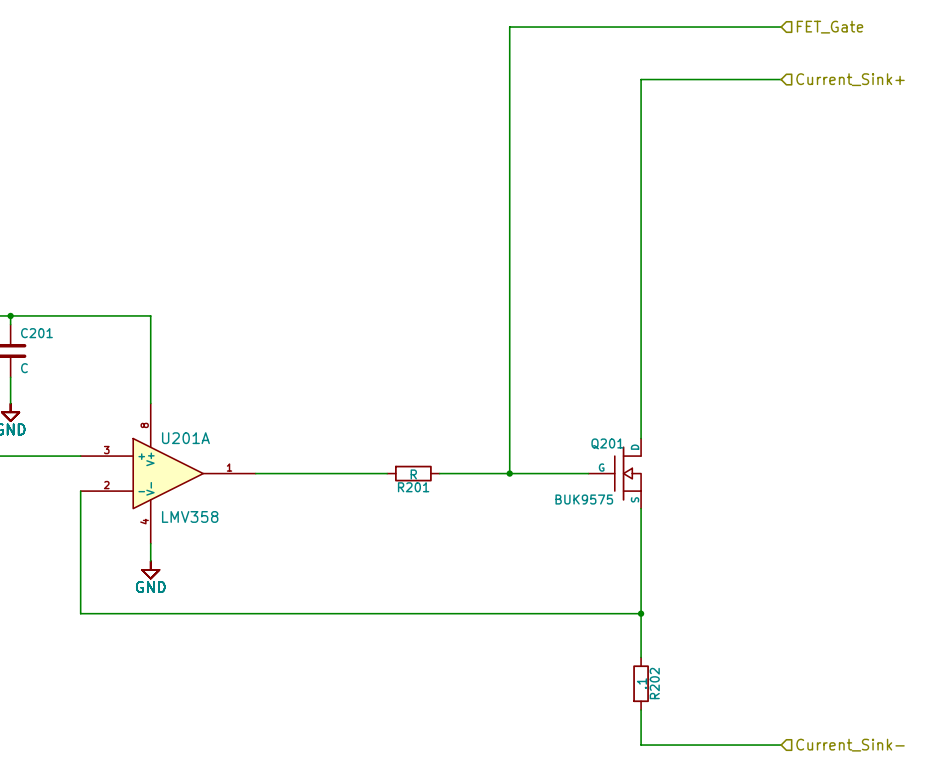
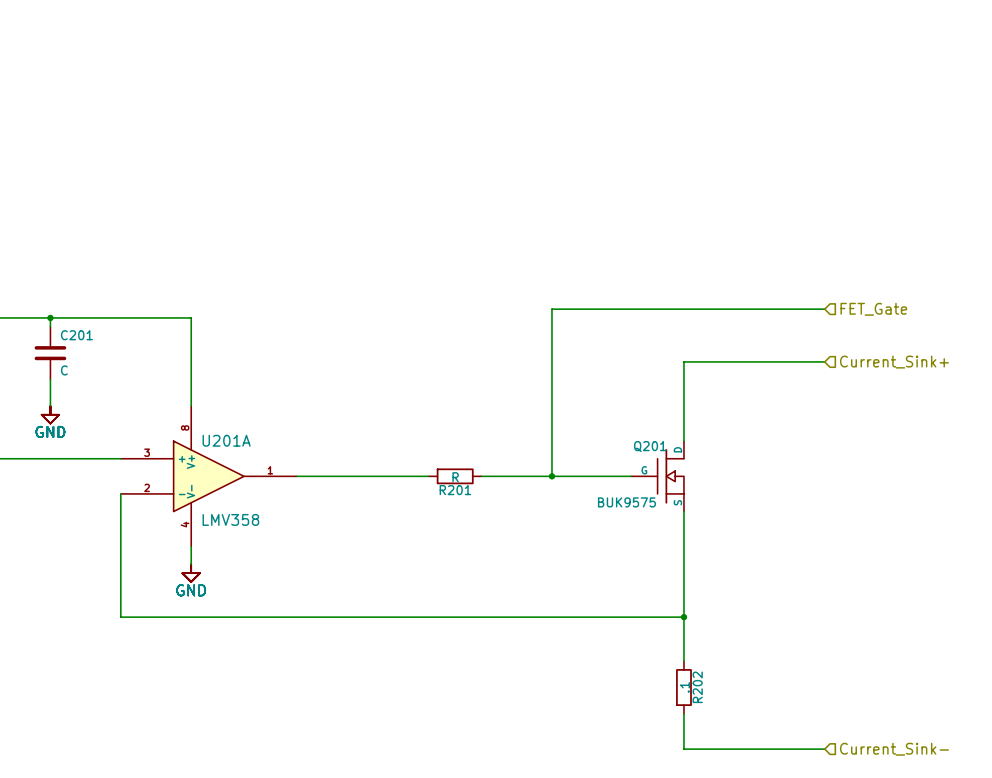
wire: (781, 27) (509, 27) (509, 307) -> (824, 309) (551, 309)
hierarchical label: FET_Gate (830, 27) -> none
wire: (781, 79) (641, 79) (641, 359) -> (824, 361) (683, 361)
hierarchical label: Current_Sink+ (850, 79) -> none
hierarchical label: none -> FET_Gate (873, 309)
hierarchical label: none -> Current_Sink+ (894, 362)

